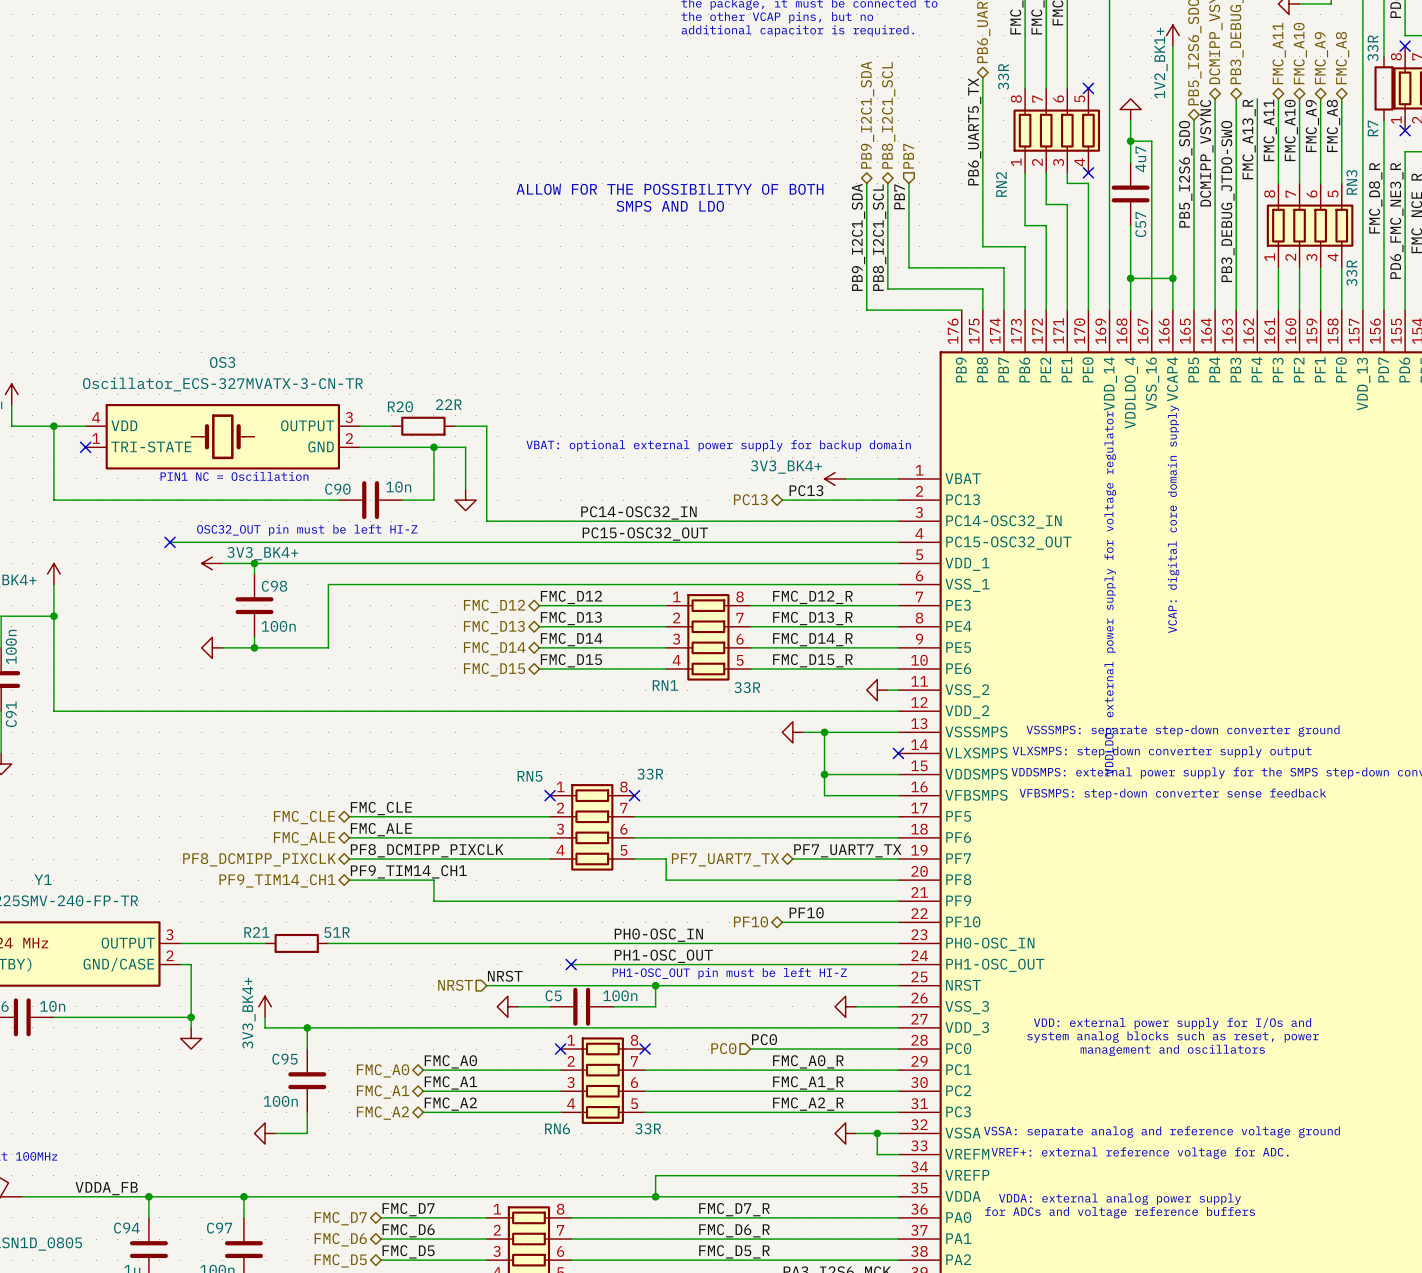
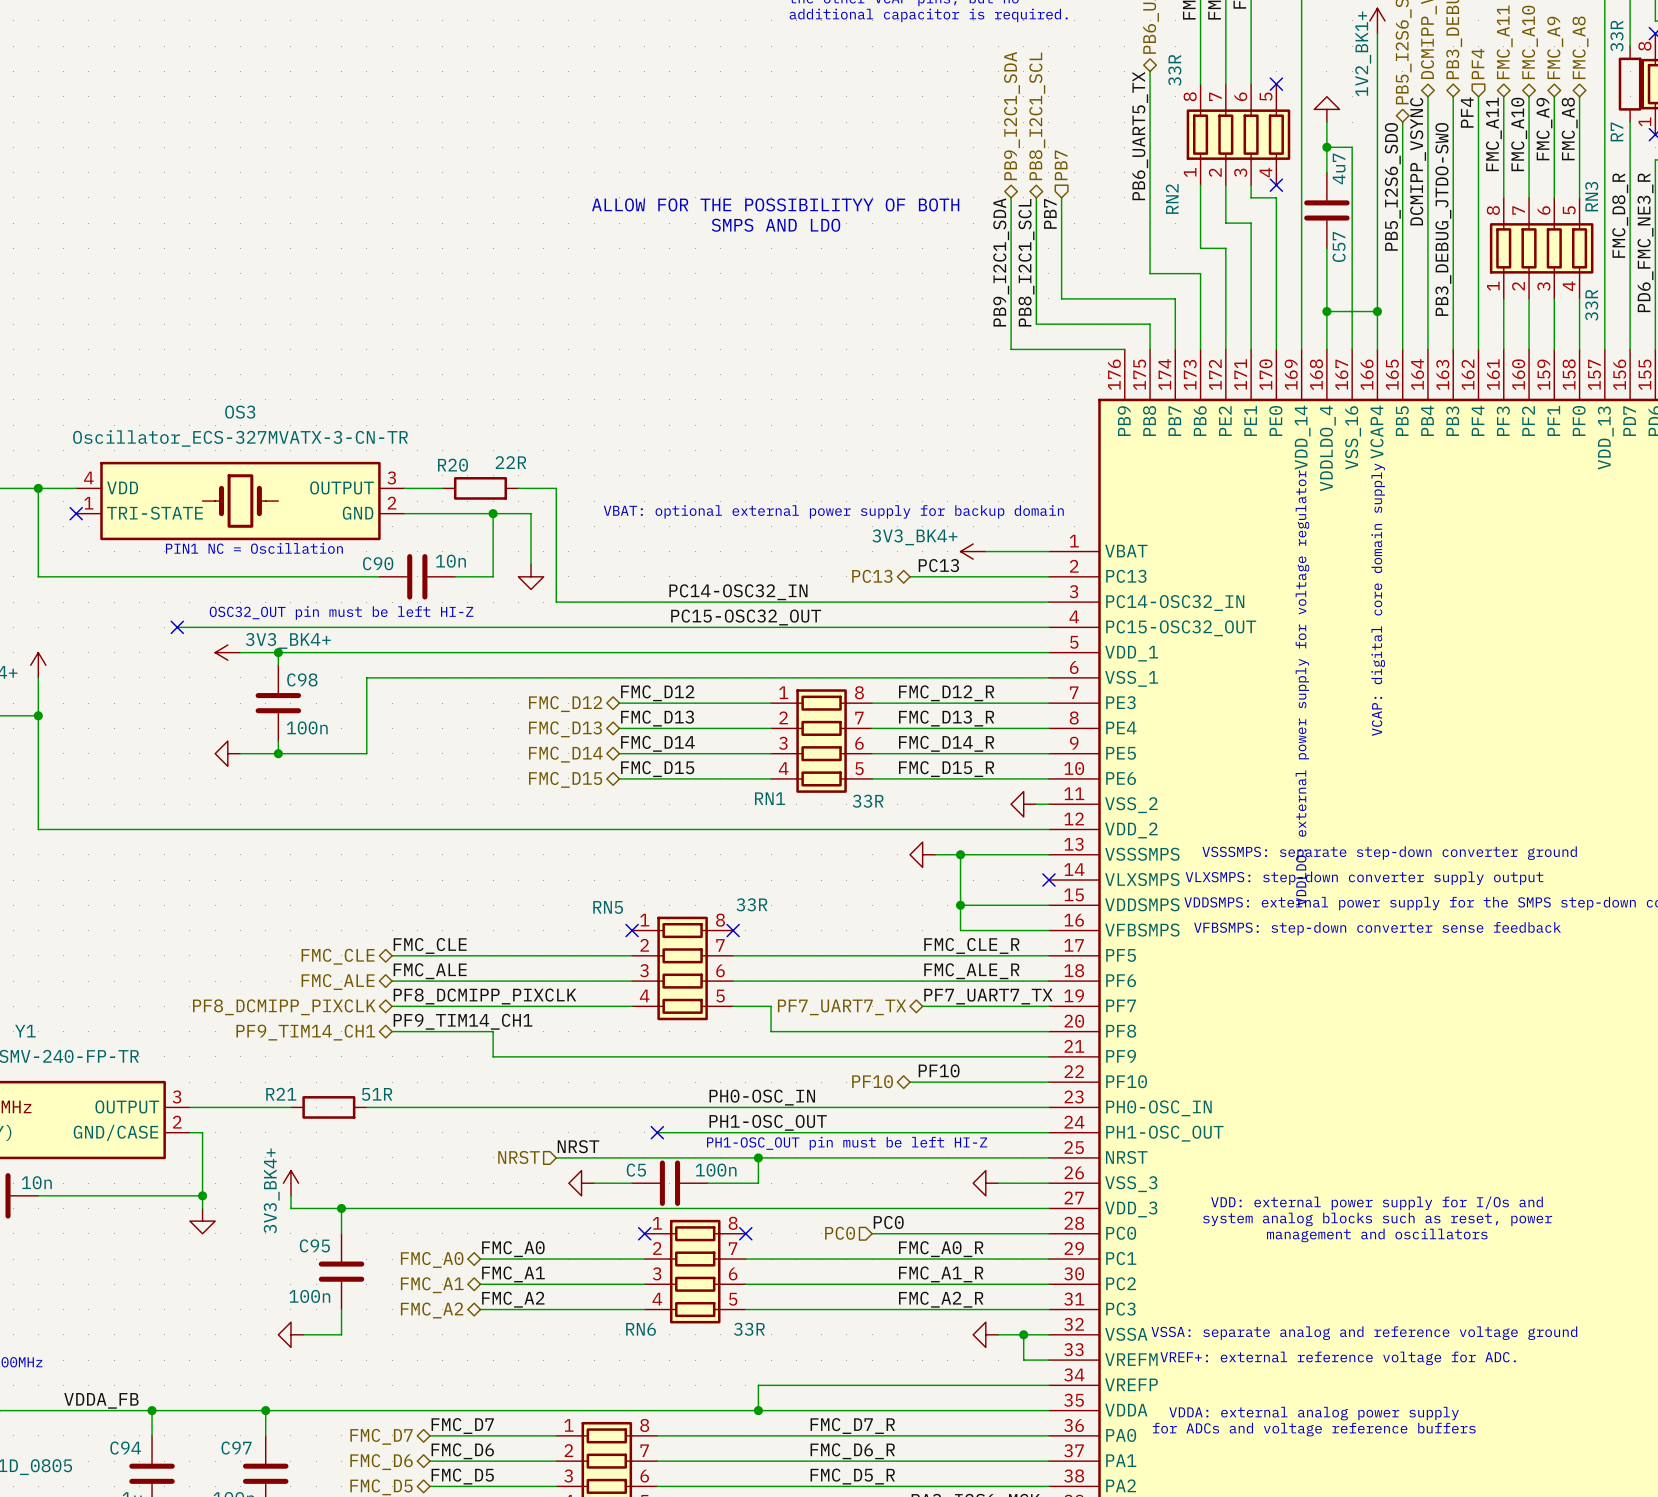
hierarchical label: none -> PF4 (1478, 63)
label: FMC_A13_R (1249, 139) -> PF4 (1467, 112)
label: none -> FMC_CLE_R (971, 945)
label: none -> FMC_ALE_R (971, 971)

